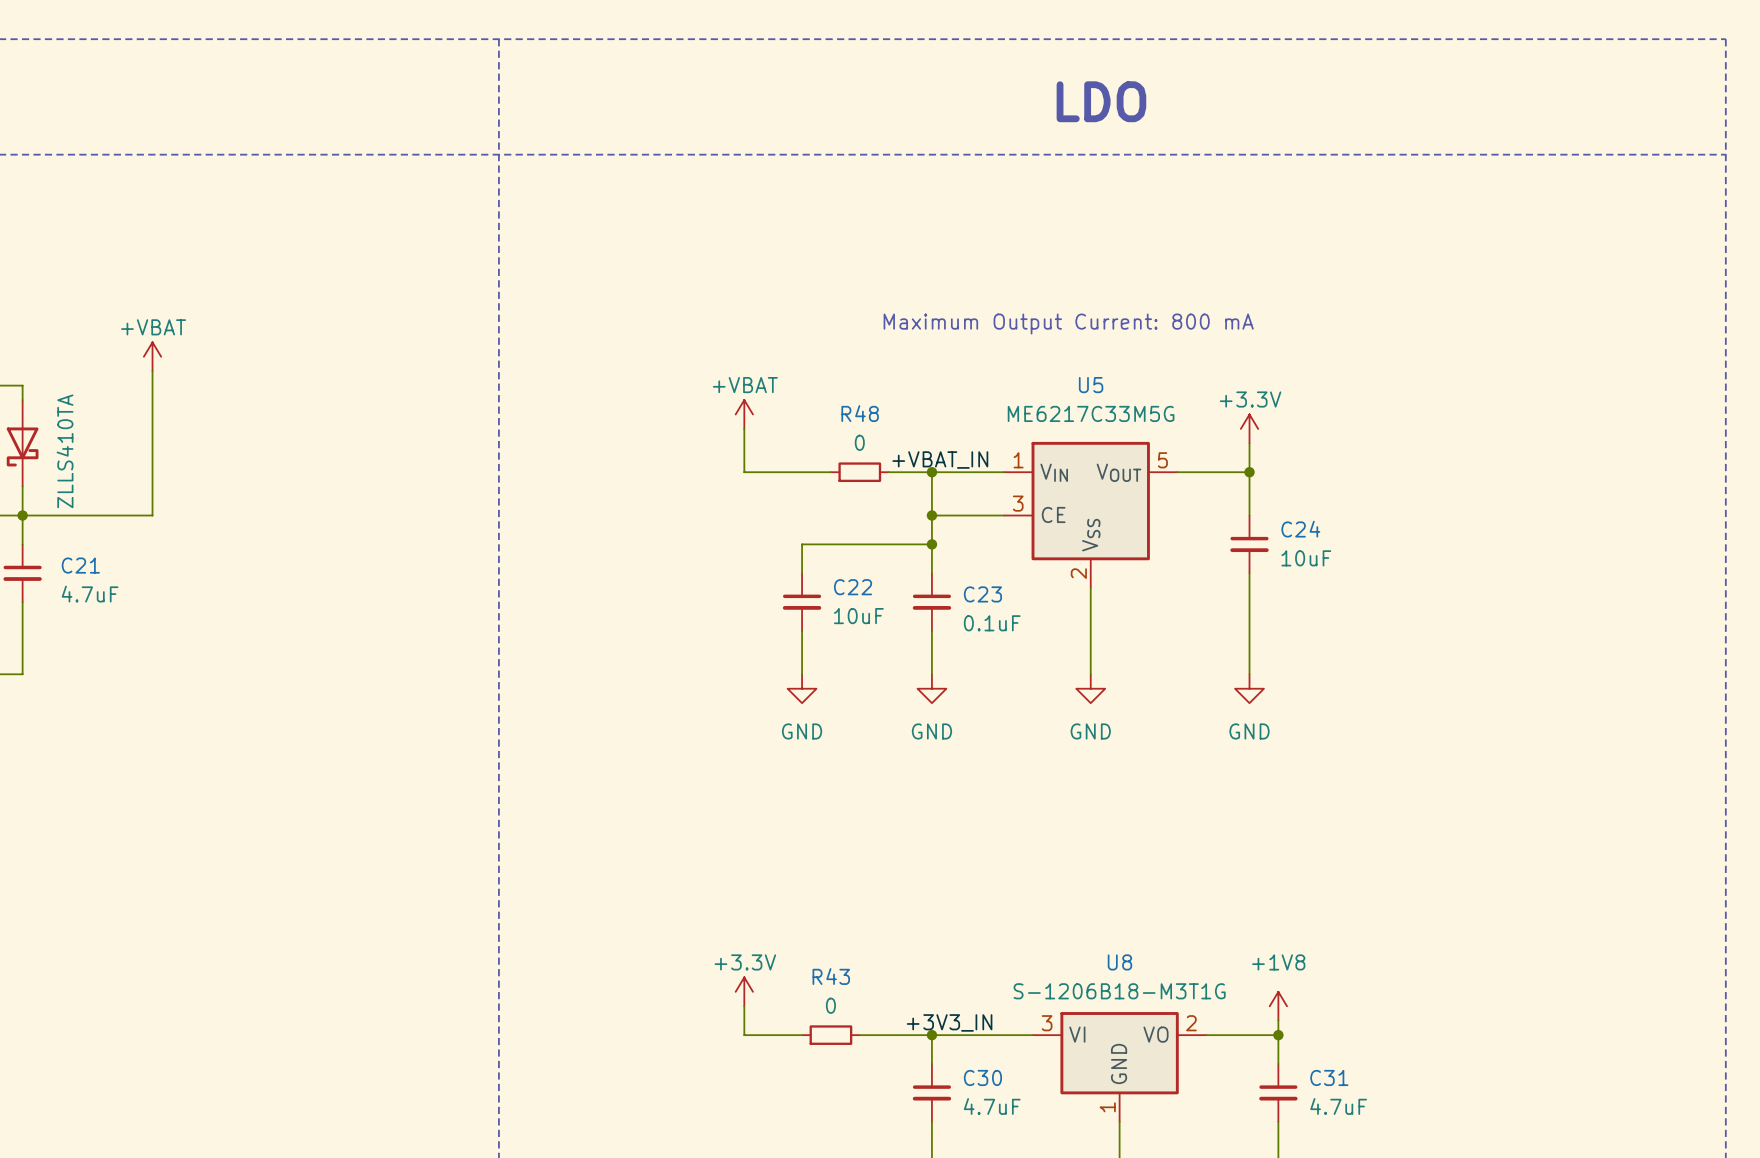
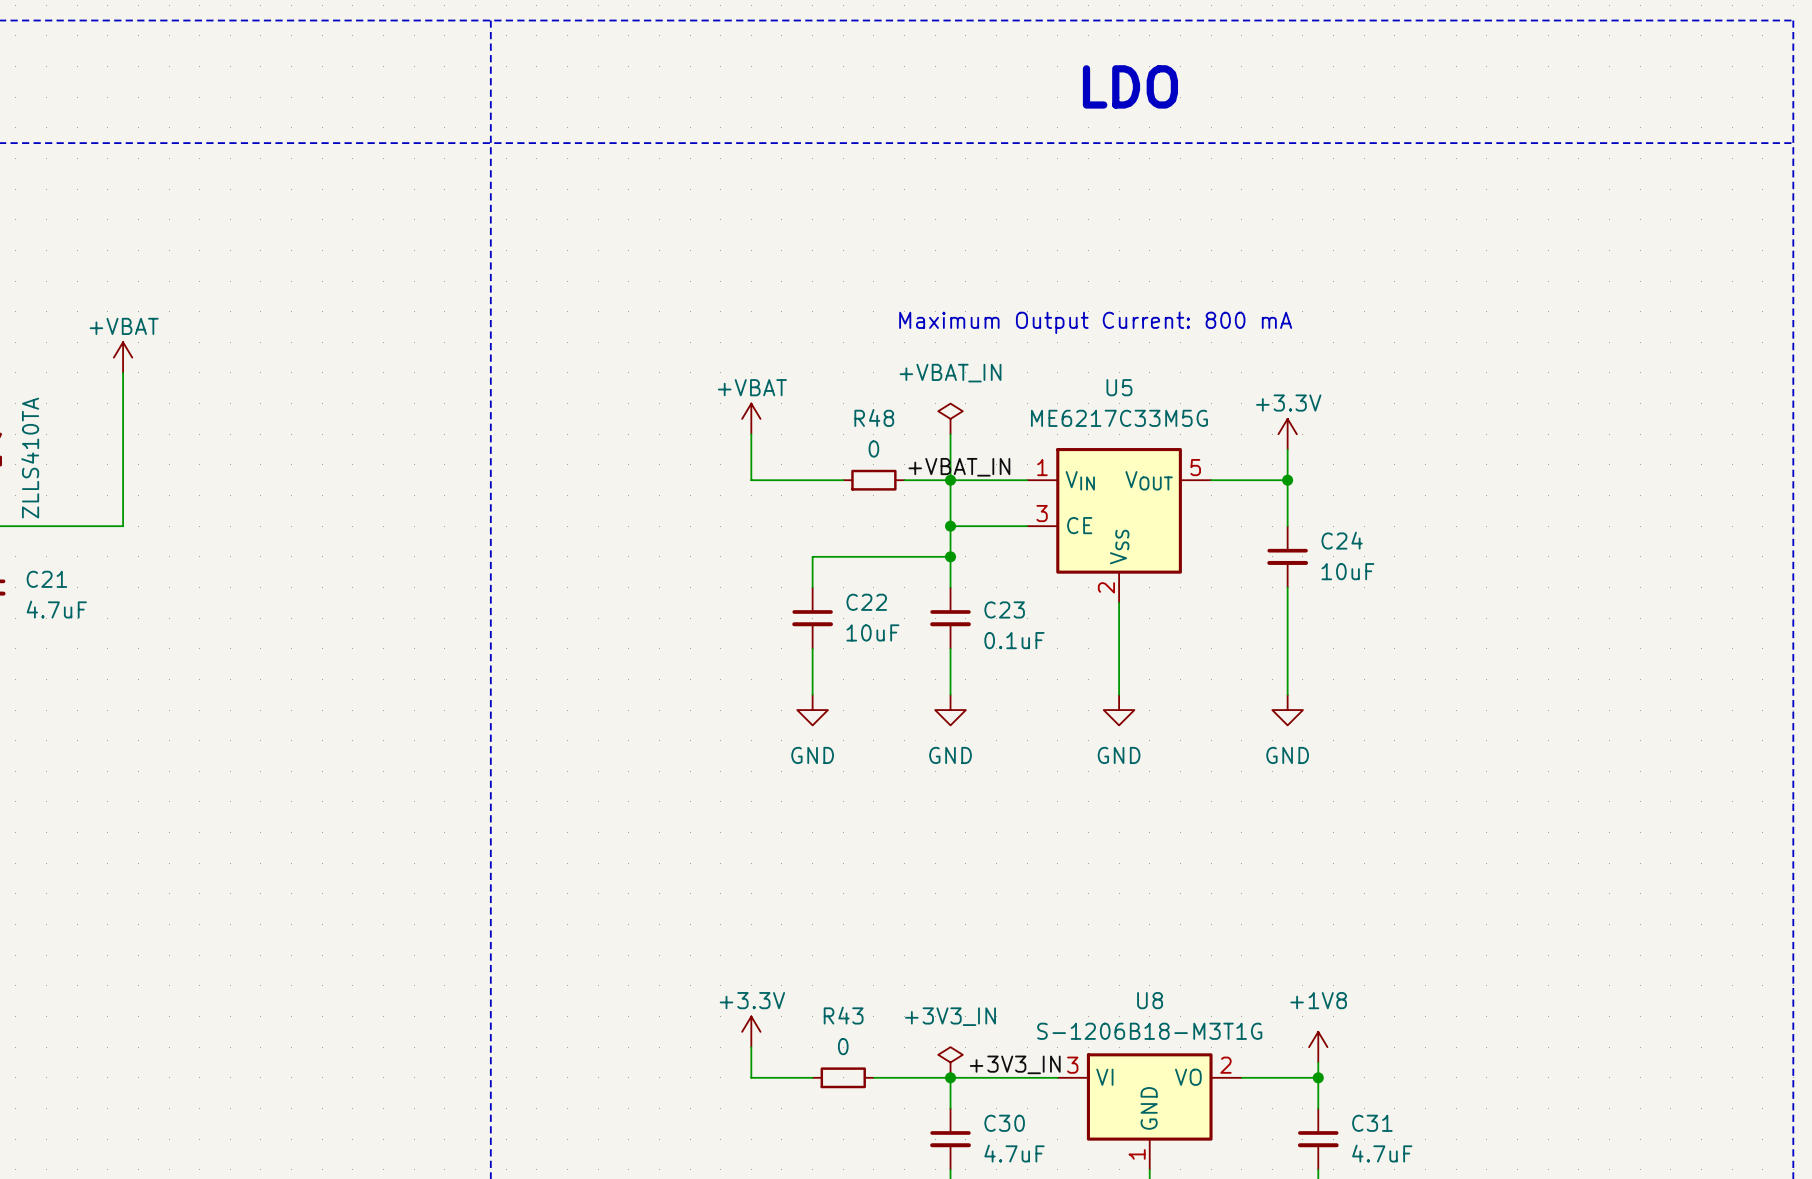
power symbol: none -> +VBAT_IN (950, 418)
wire: none -> (950, 434) (950, 480)
power symbol: none -> +3V3_IN (950, 1062)
label position: +3V3_IN (949, 1022) -> +3V3_IN (1015, 1064)

